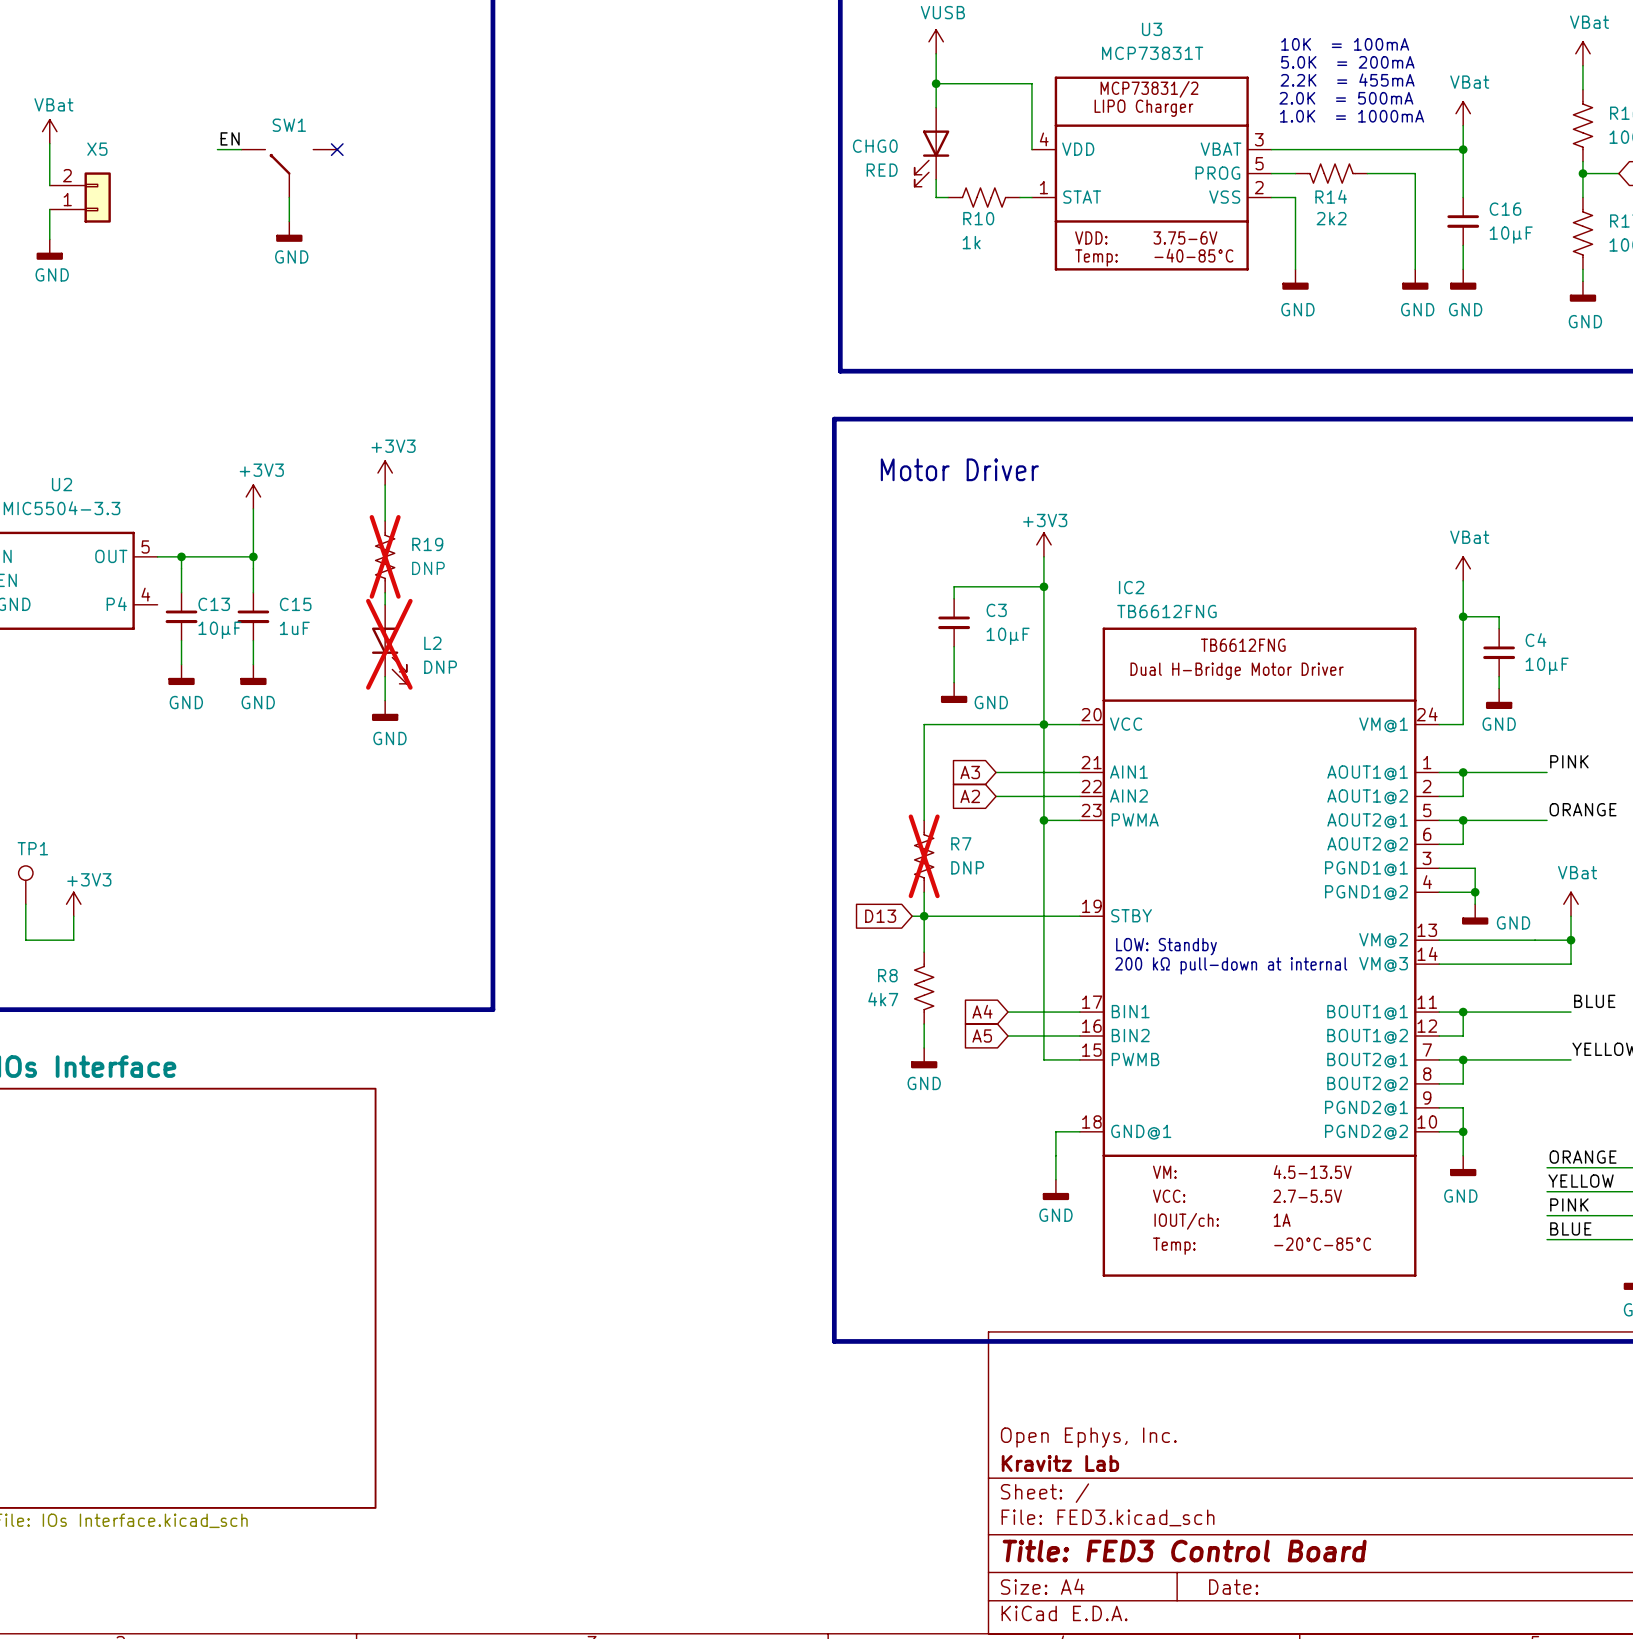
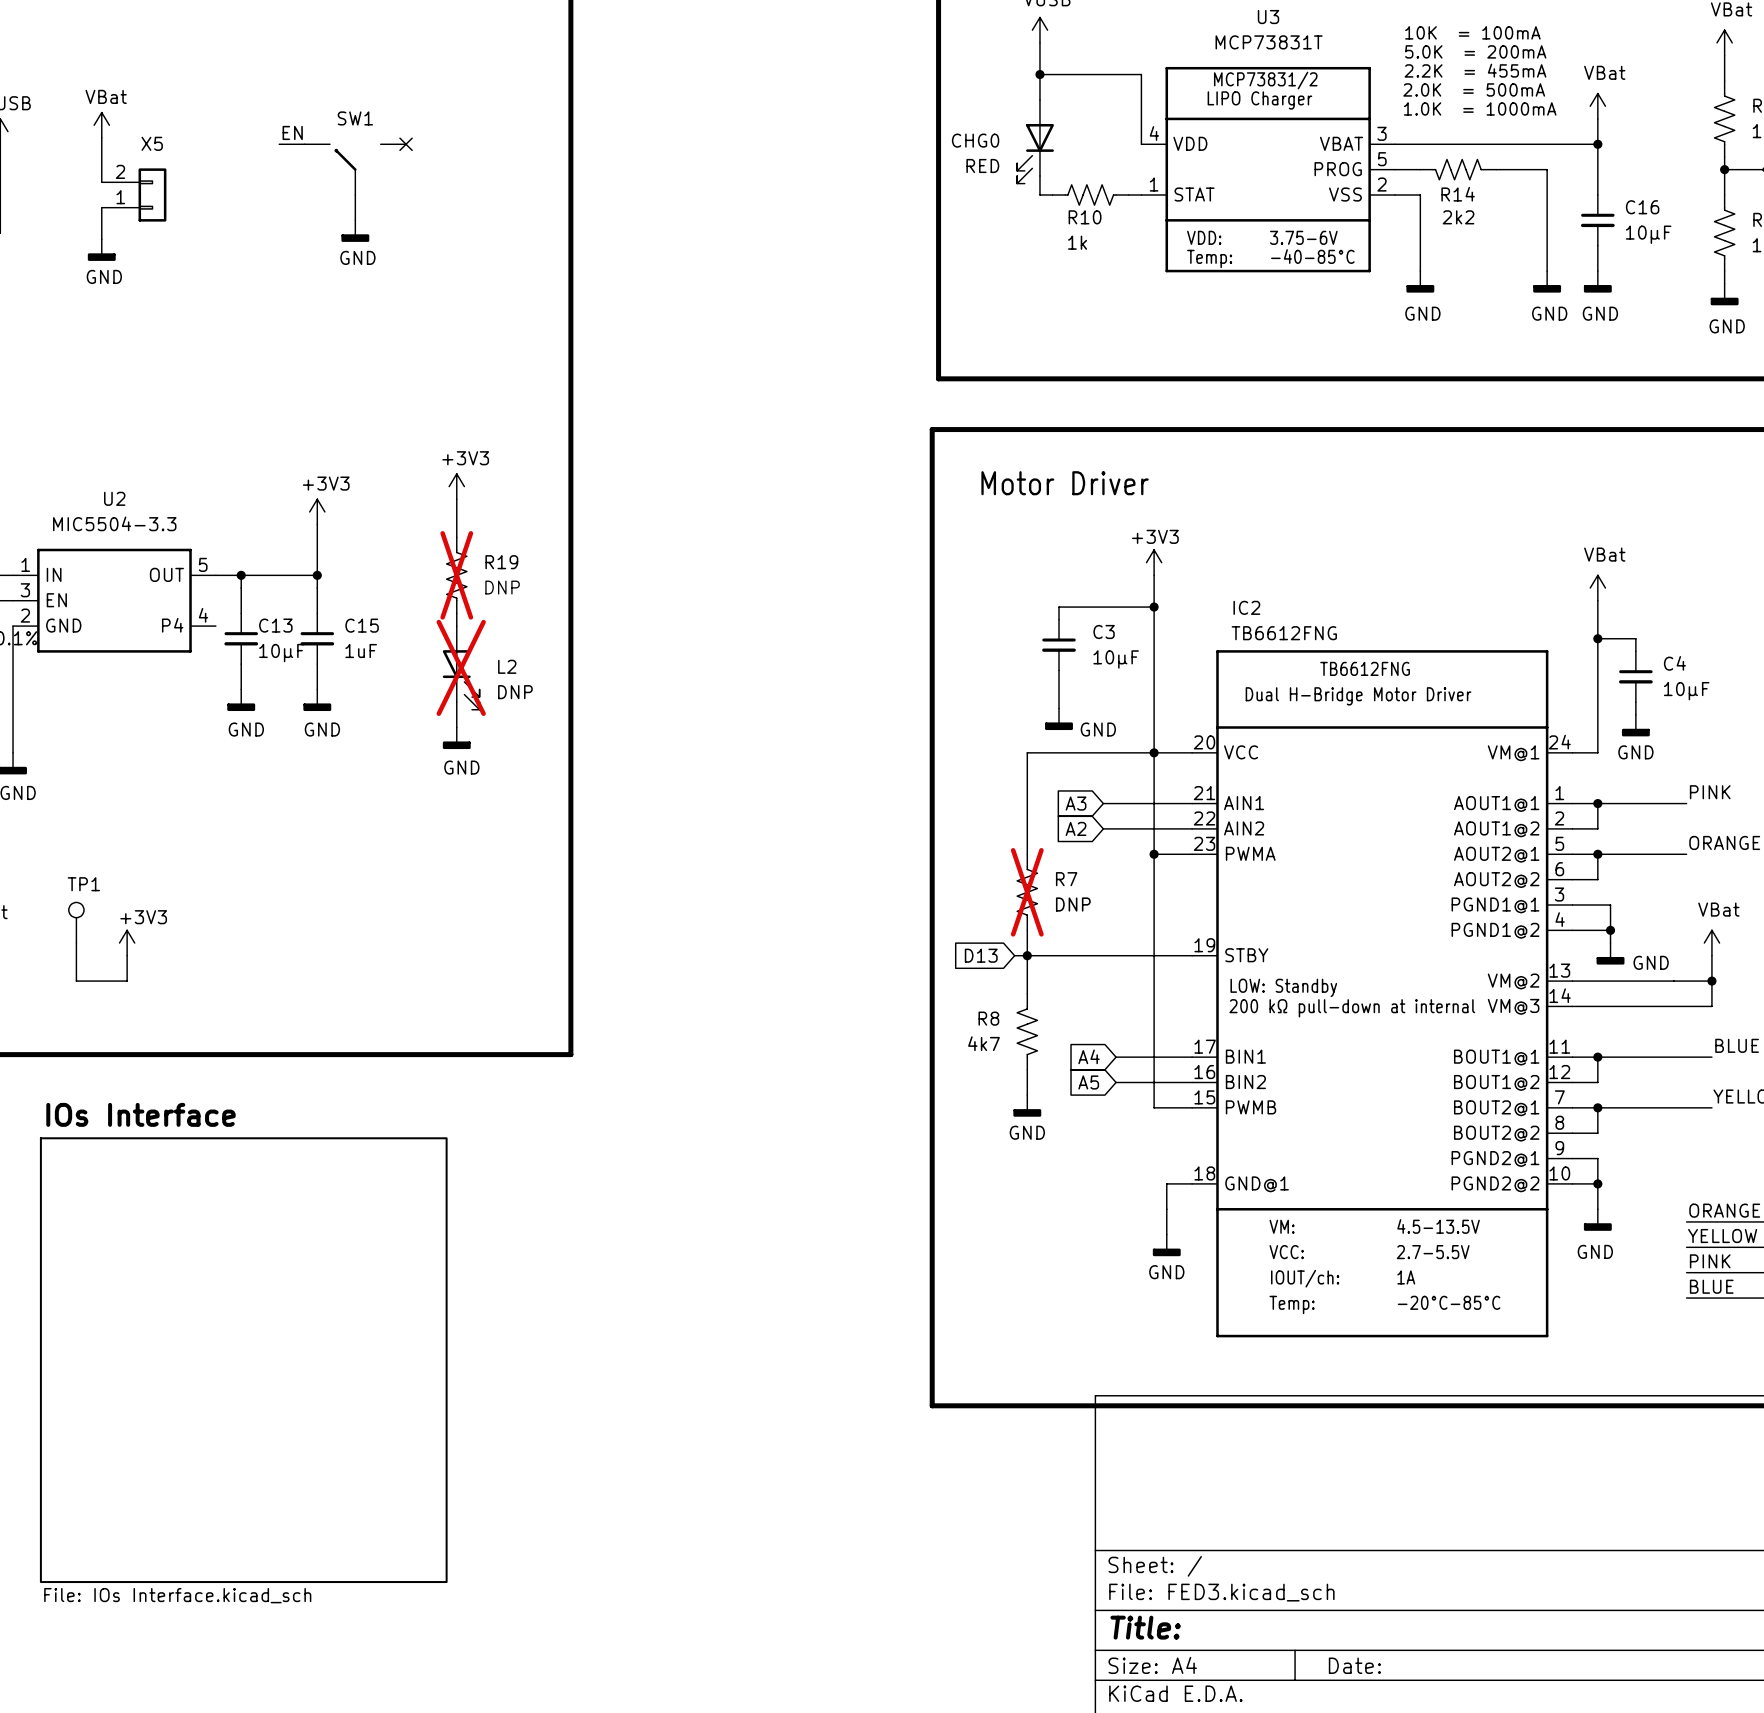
title block: Open Ephys, Inc. (1088, 1437) -> none
title block: Kravitz Lab (1060, 1463) -> none
title block: Title: FED3 Control Board (1184, 1551) -> Title: (1145, 1627)

